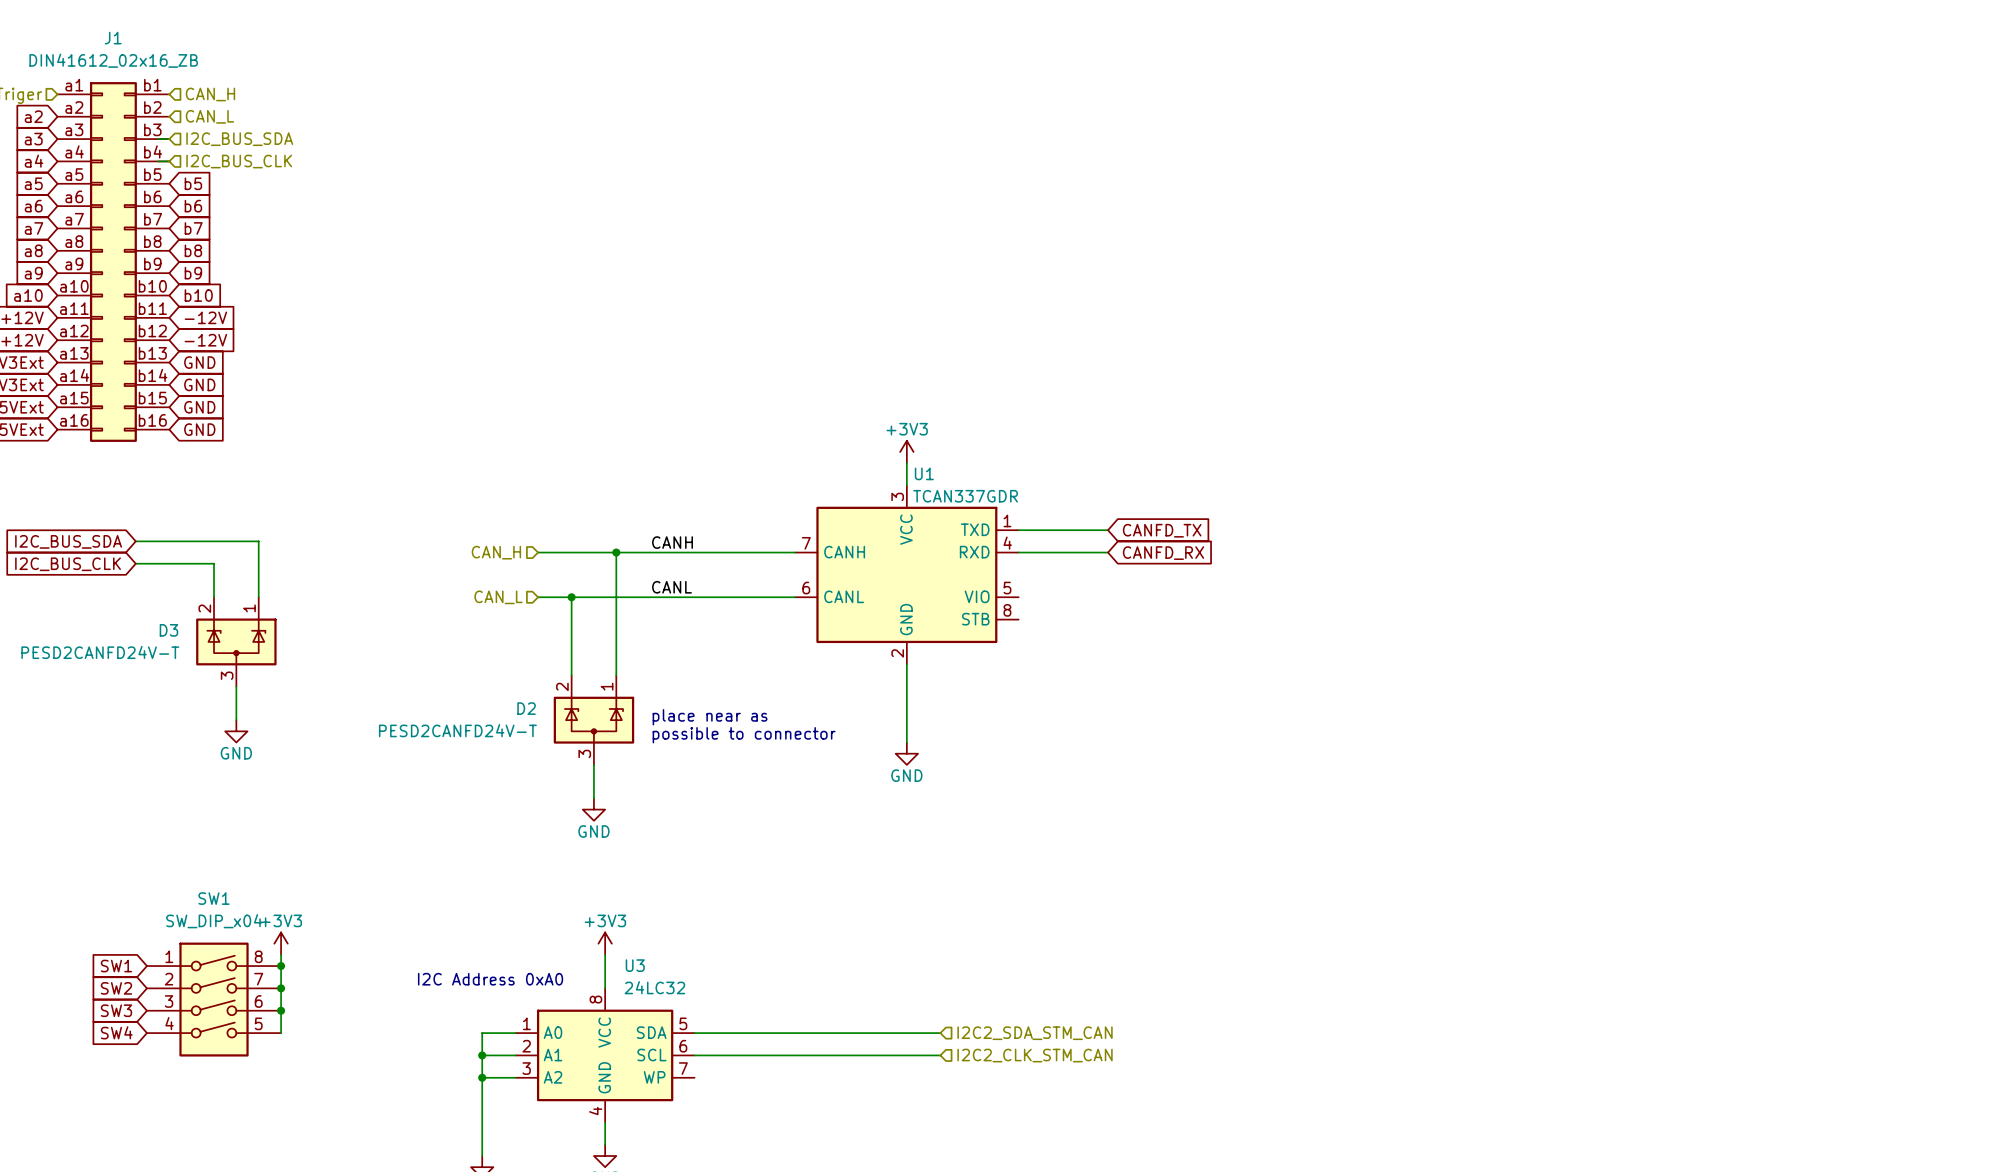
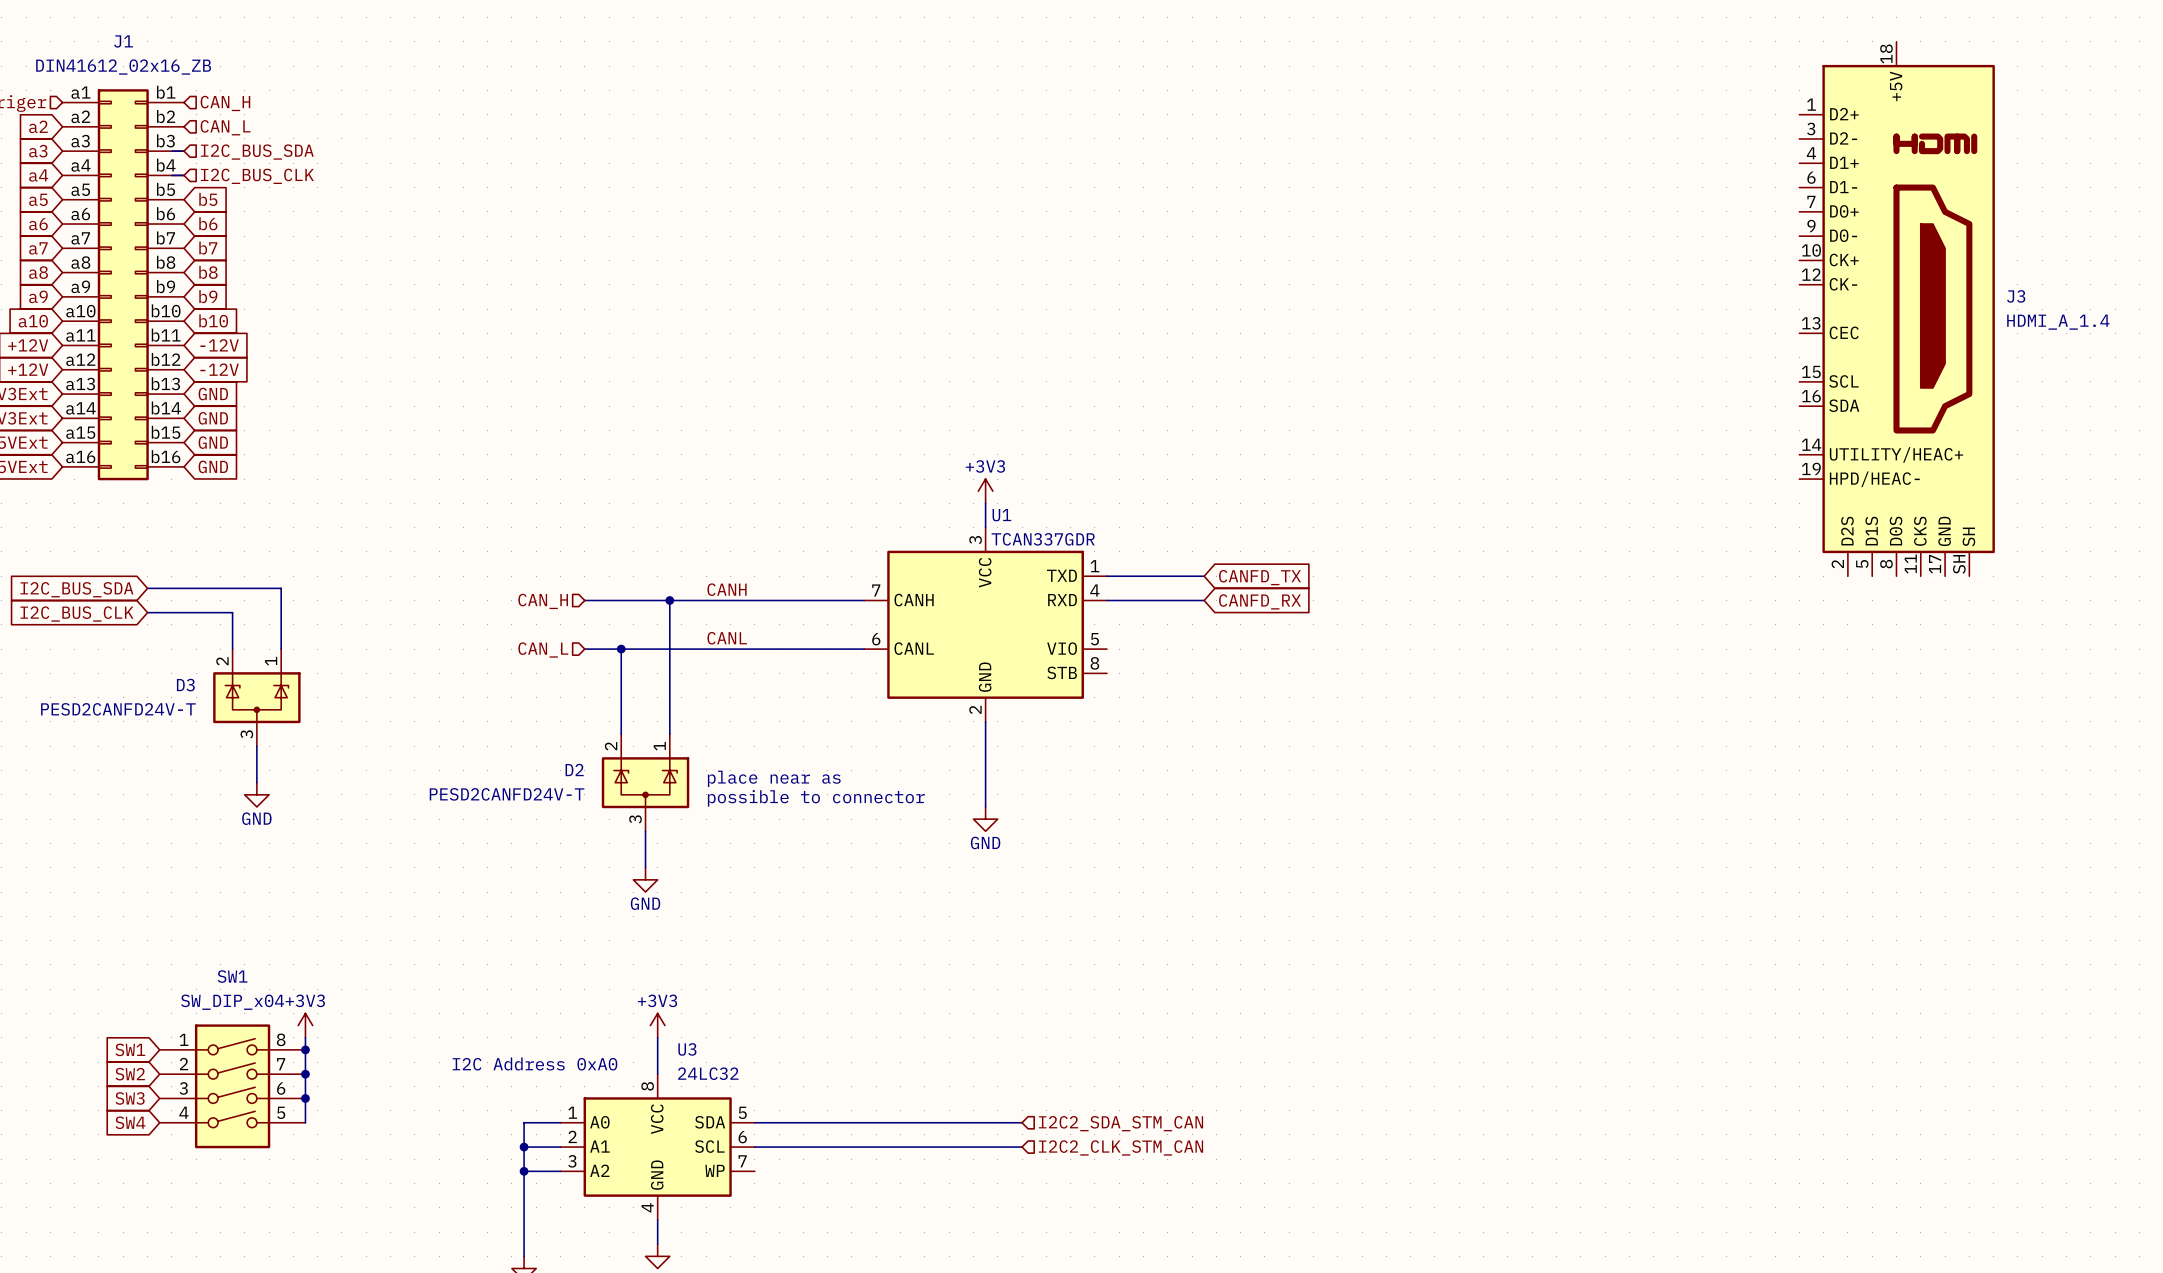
J3: none -> HDMI_A_1.4 (1897, 309)

